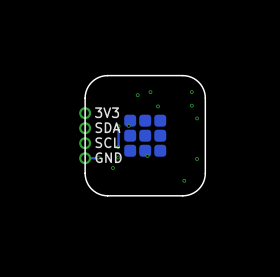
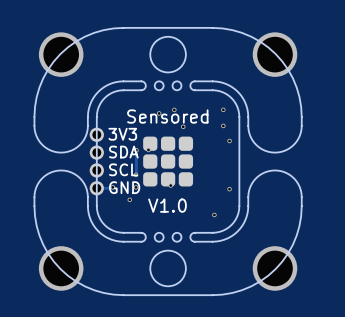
round board edge: none -> [149, 36, 187, 73]
via: none -> (61, 54)
via: none -> (275, 54)
round board edge: none -> [154, 80, 165, 91]
round board edge: none -> [172, 80, 182, 91]
board edge: (167, 75) (122, 75) -> (194, 90) (190, 85) (194, 81) (220, 82) (234, 89) (246, 105) (250, 136) (256, 144) (264, 150) (275, 152) (285, 150) (293, 144) (299, 136) (301, 116) (299, 97) (292, 78) (282, 61) (268, 47) (251, 36) (232, 30) (212, 27) (113, 28) (94, 32) (76, 41) (53, 61) (43, 78) (35, 107) (34, 125) (36, 136) (42, 144) (50, 150) (61, 152) (71, 150) (80, 144) (85, 136) (89, 105) (101, 89) (115, 82) (141, 81) (145, 85) (141, 90)
text: none -> Sensored (167, 116)
text: none -> V1.0 (167, 205)
round board edge: none -> [154, 232, 165, 243]
round board edge: none -> [172, 232, 182, 243]
board edge: (167, 195) (122, 195) -> (194, 232) (190, 237) (194, 241) (220, 240) (234, 233) (246, 217) (250, 186) (256, 178) (264, 172) (275, 170) (285, 172) (293, 178) (299, 186) (301, 197) (301, 216) (292, 244) (282, 261) (260, 281) (242, 290) (222, 294) (123, 295) (103, 292) (84, 286) (67, 275) (53, 261) (43, 244) (36, 225) (34, 206) (36, 186) (42, 178) (50, 172) (61, 170) (71, 172) (80, 178) (85, 186) (89, 217) (101, 233) (115, 240) (141, 241) (145, 237) (141, 232)
round board edge: none -> [149, 250, 187, 287]
via: none -> (61, 268)
via: none -> (275, 268)

